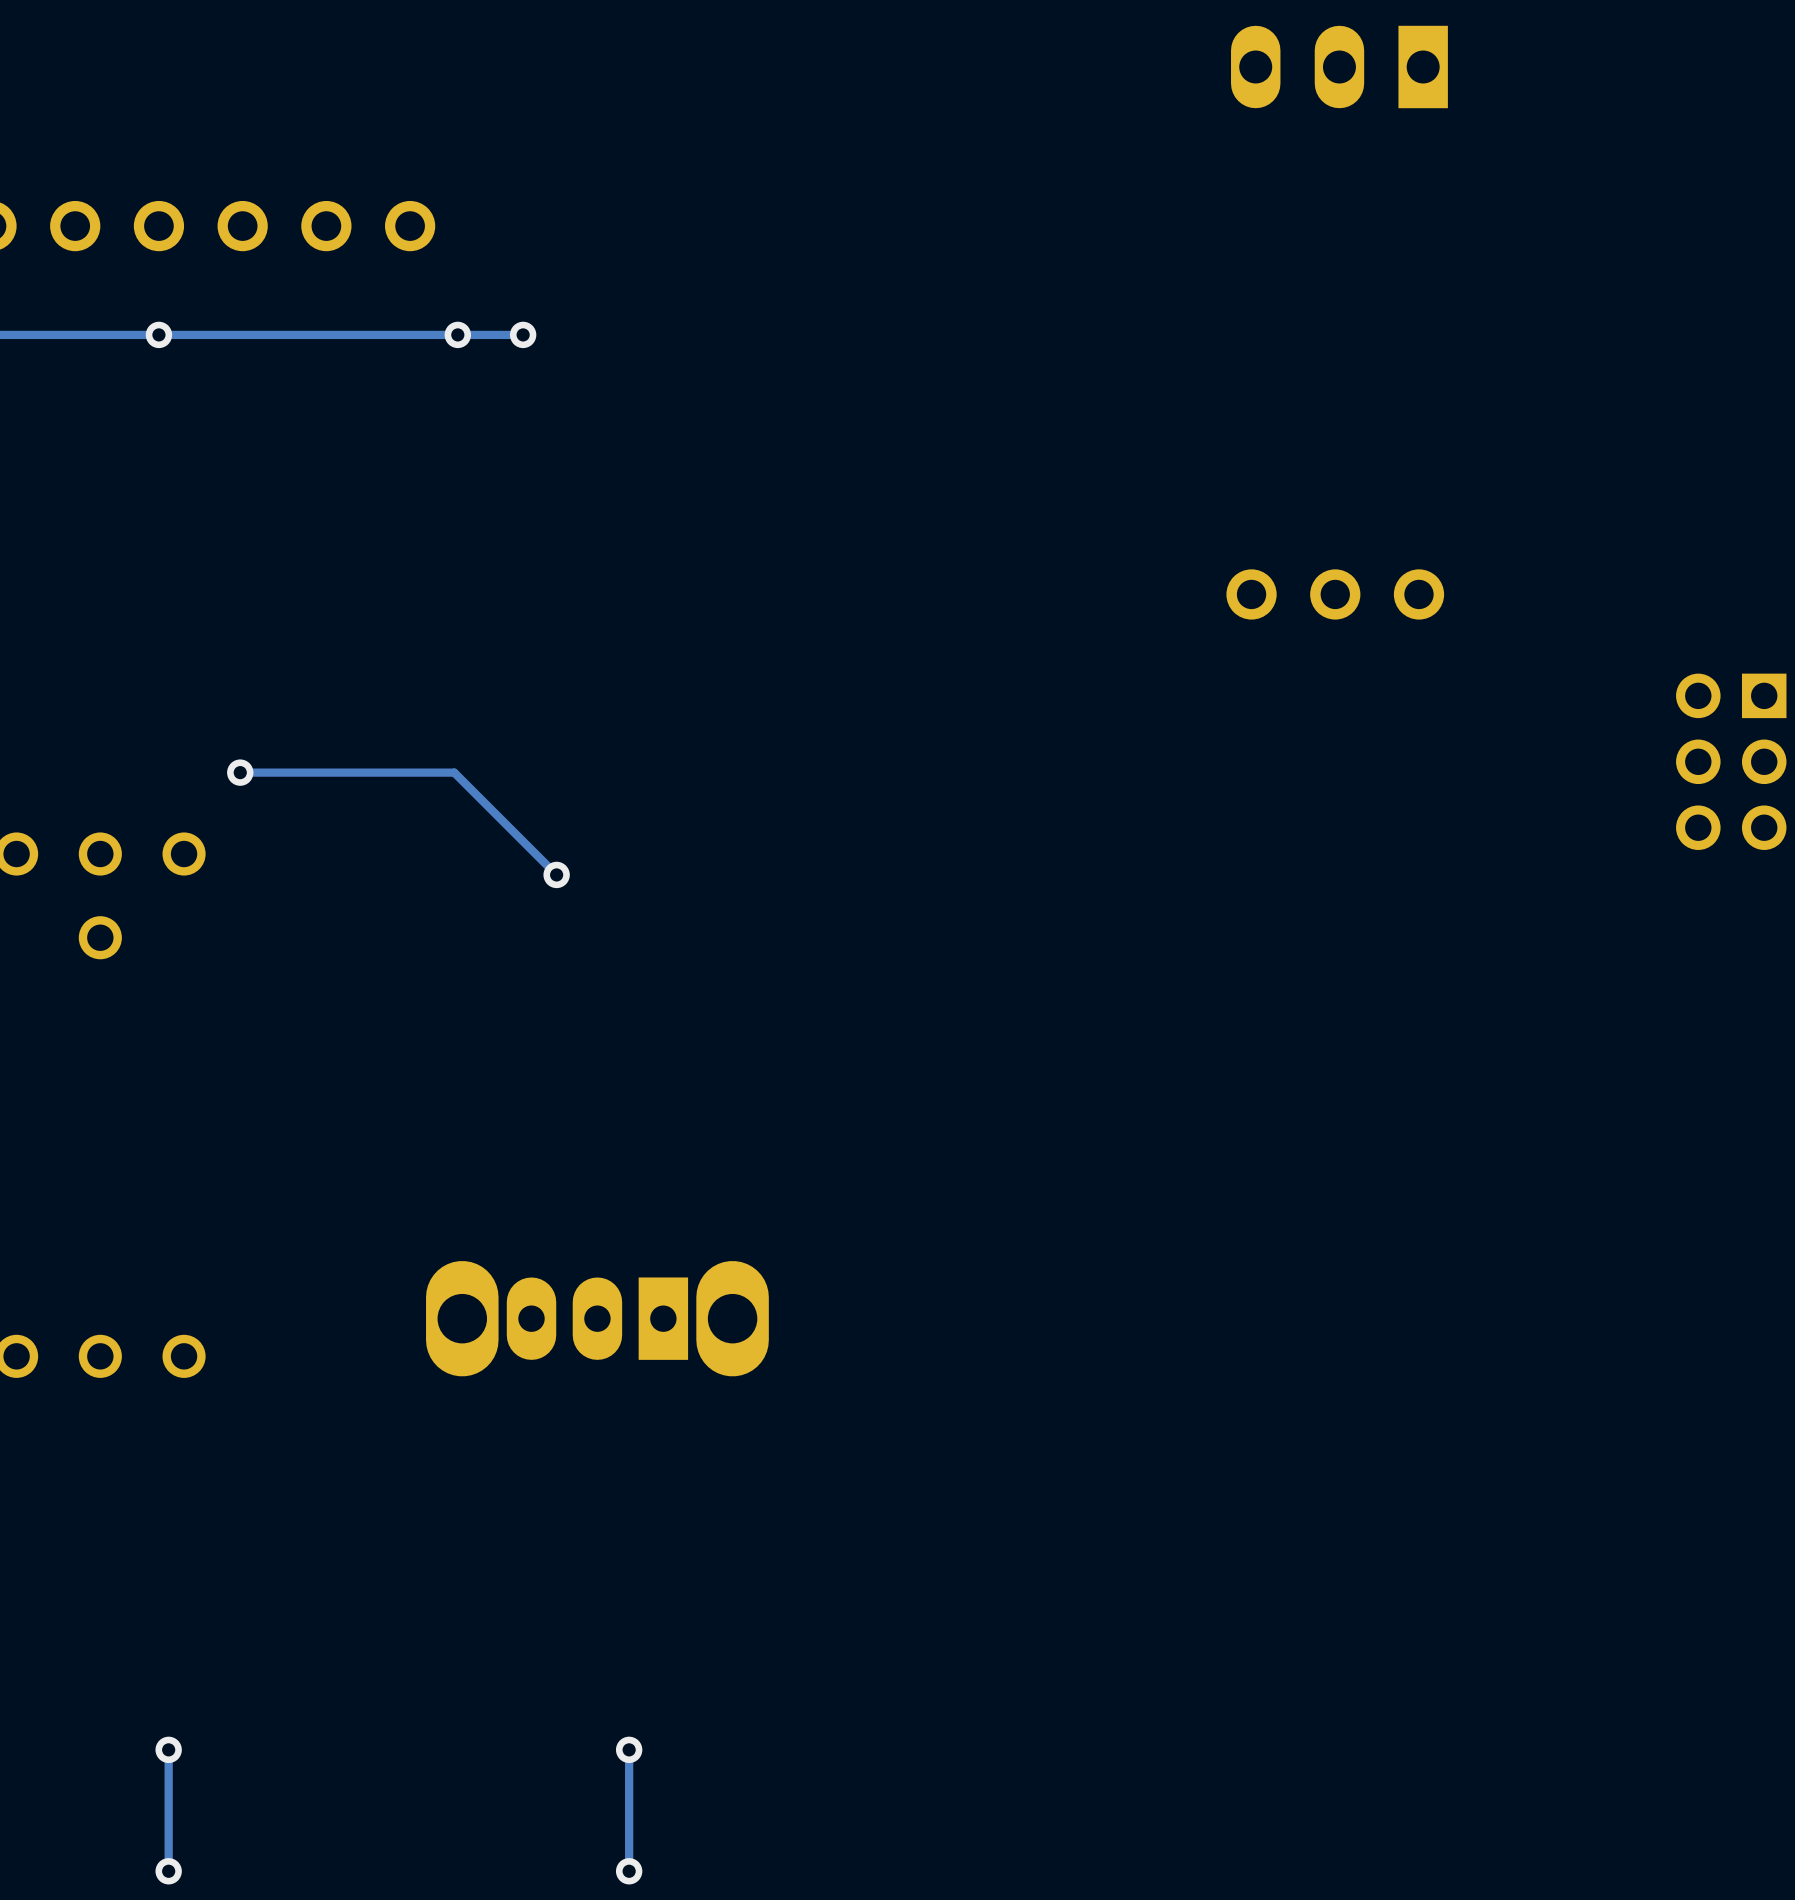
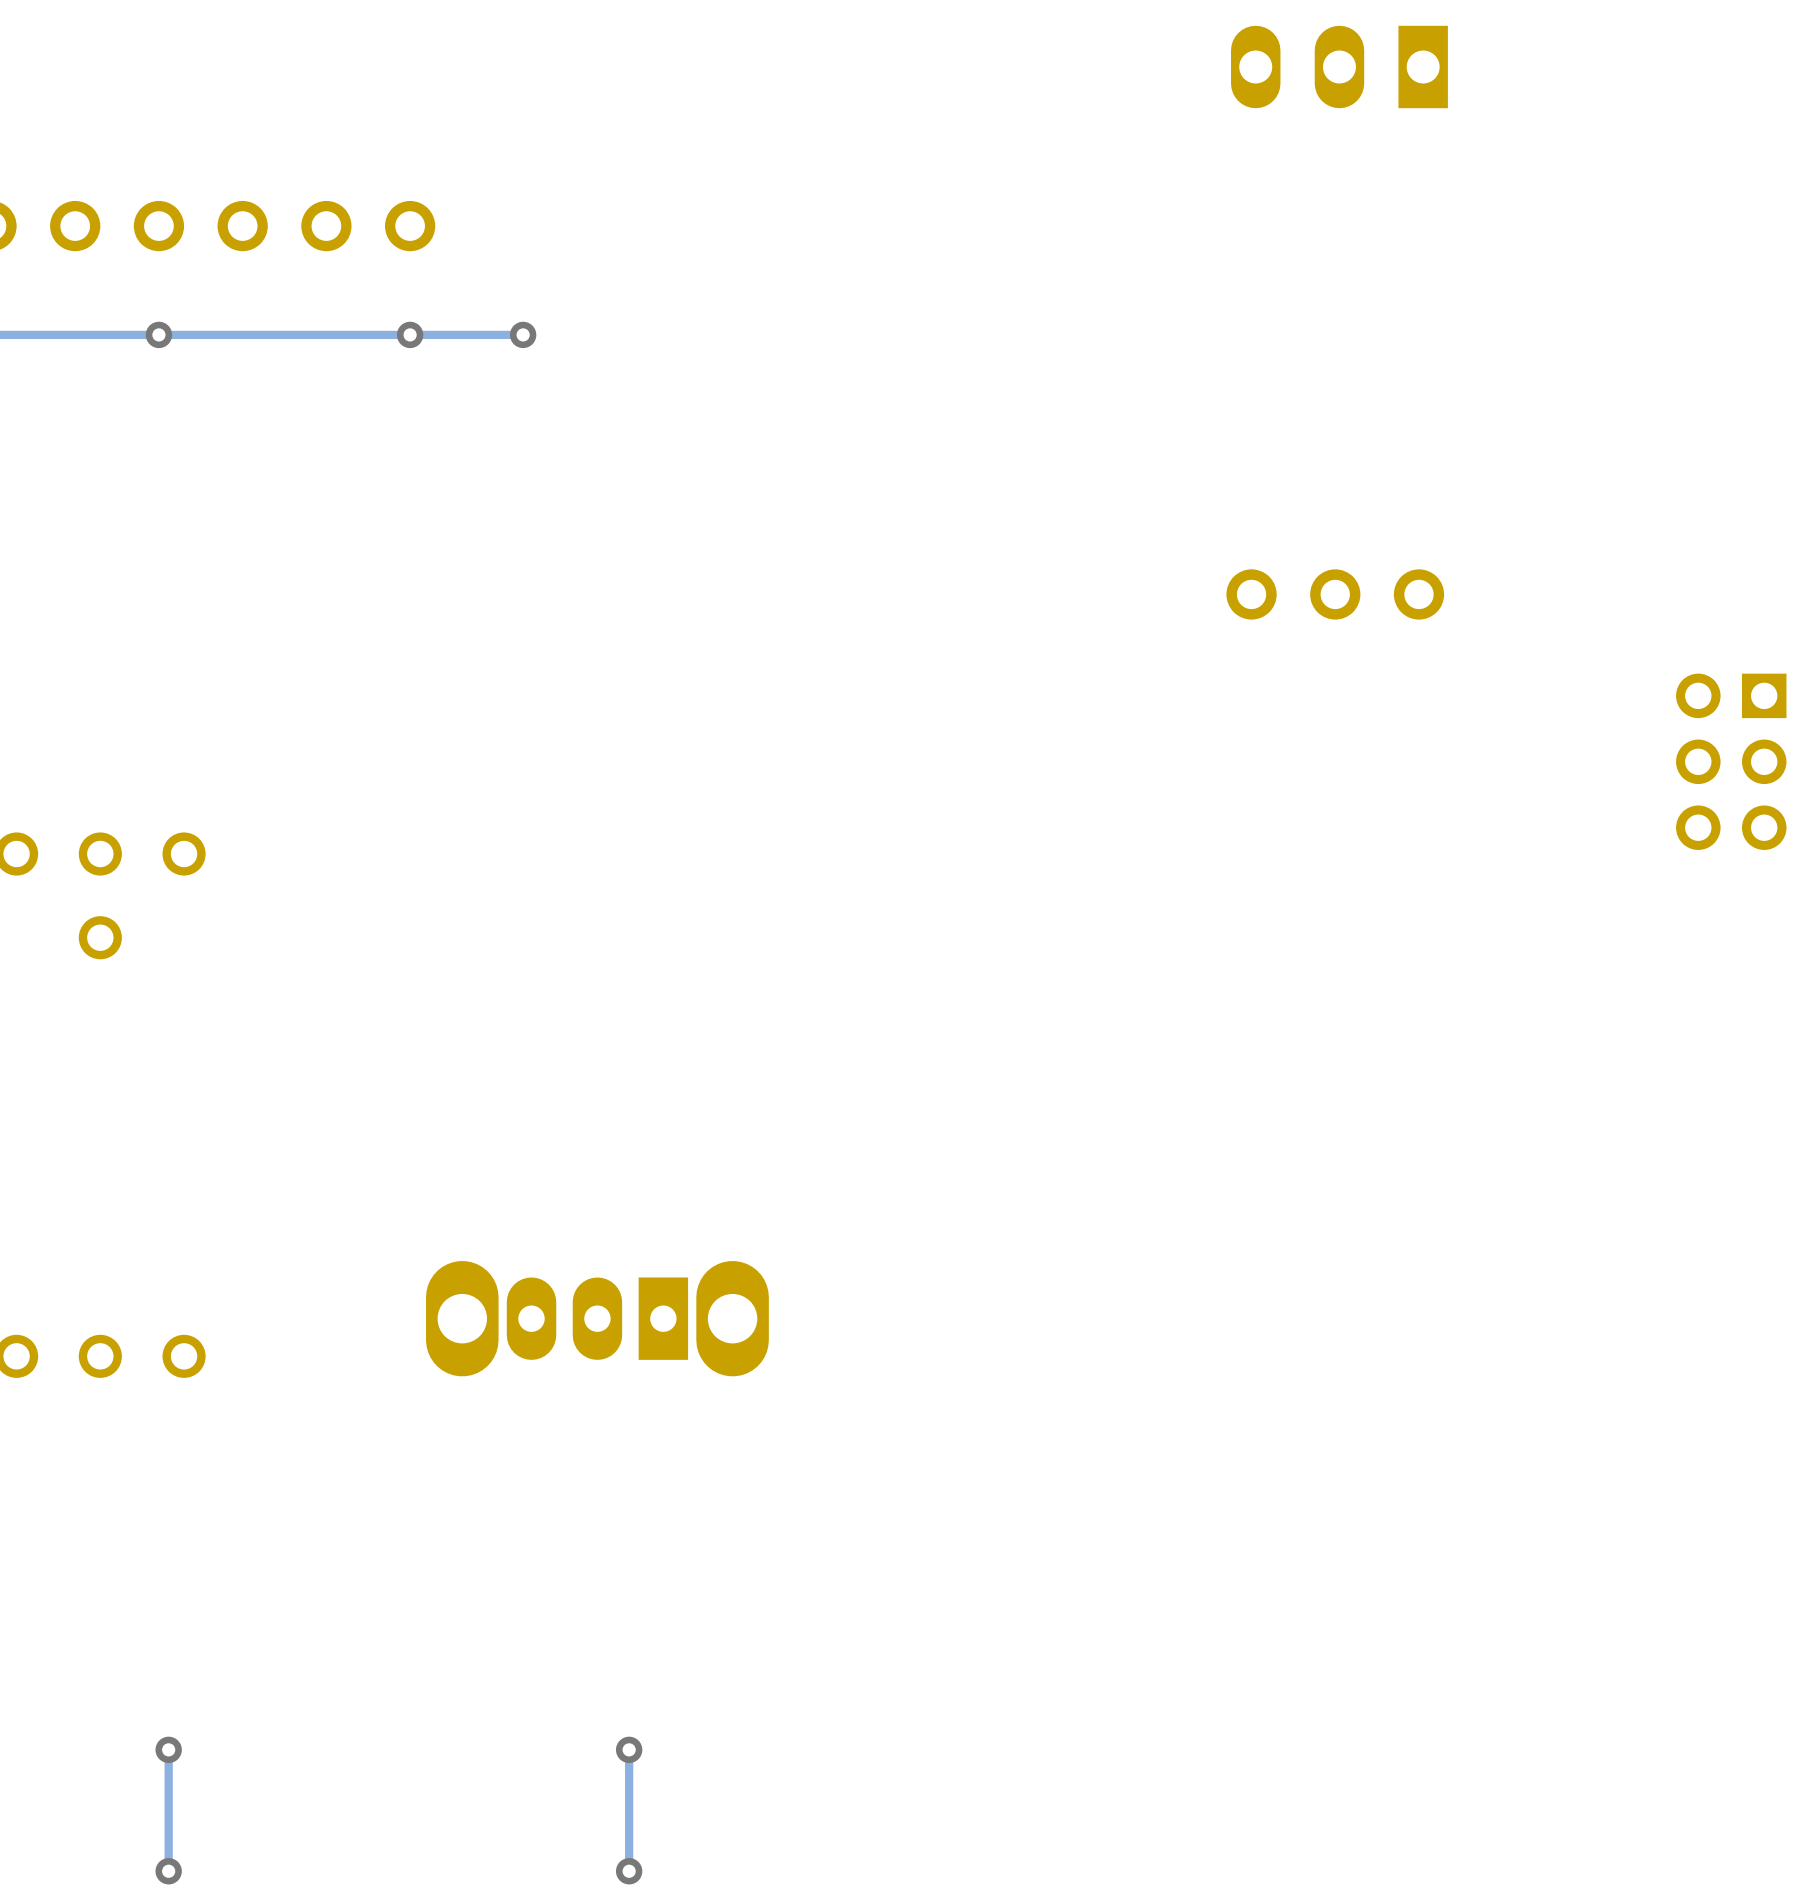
via position: (457, 334) -> (410, 334)
track: (240, 772) (454, 772) (556, 874) -> none
via: (240, 772) -> none
via: (556, 874) -> none

